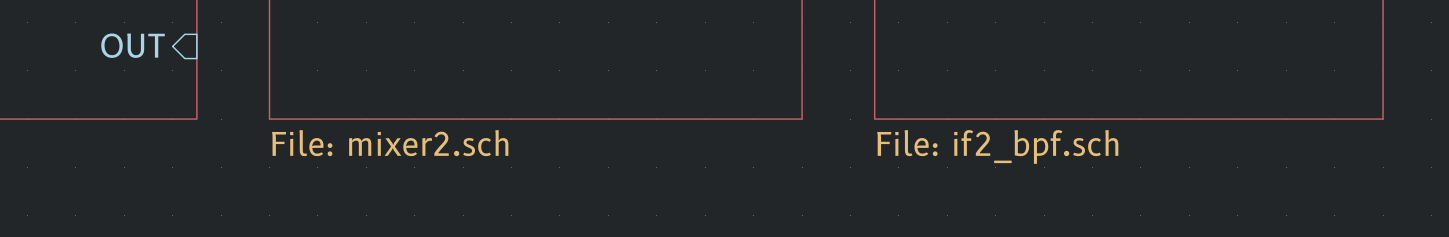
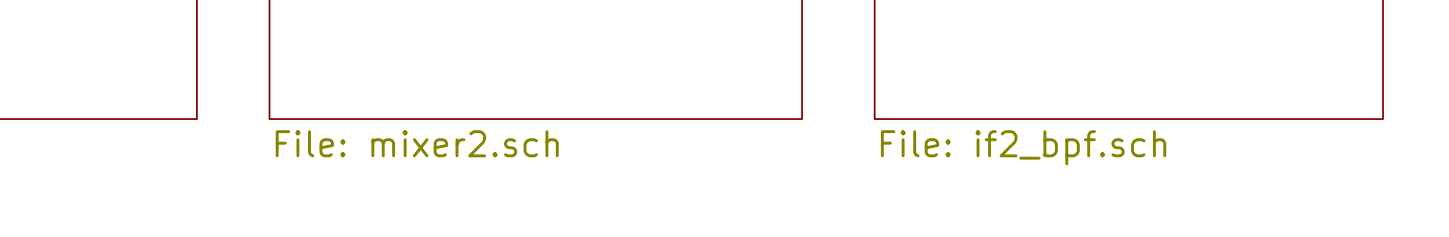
sheet pin: OUT (133, 45) -> none

